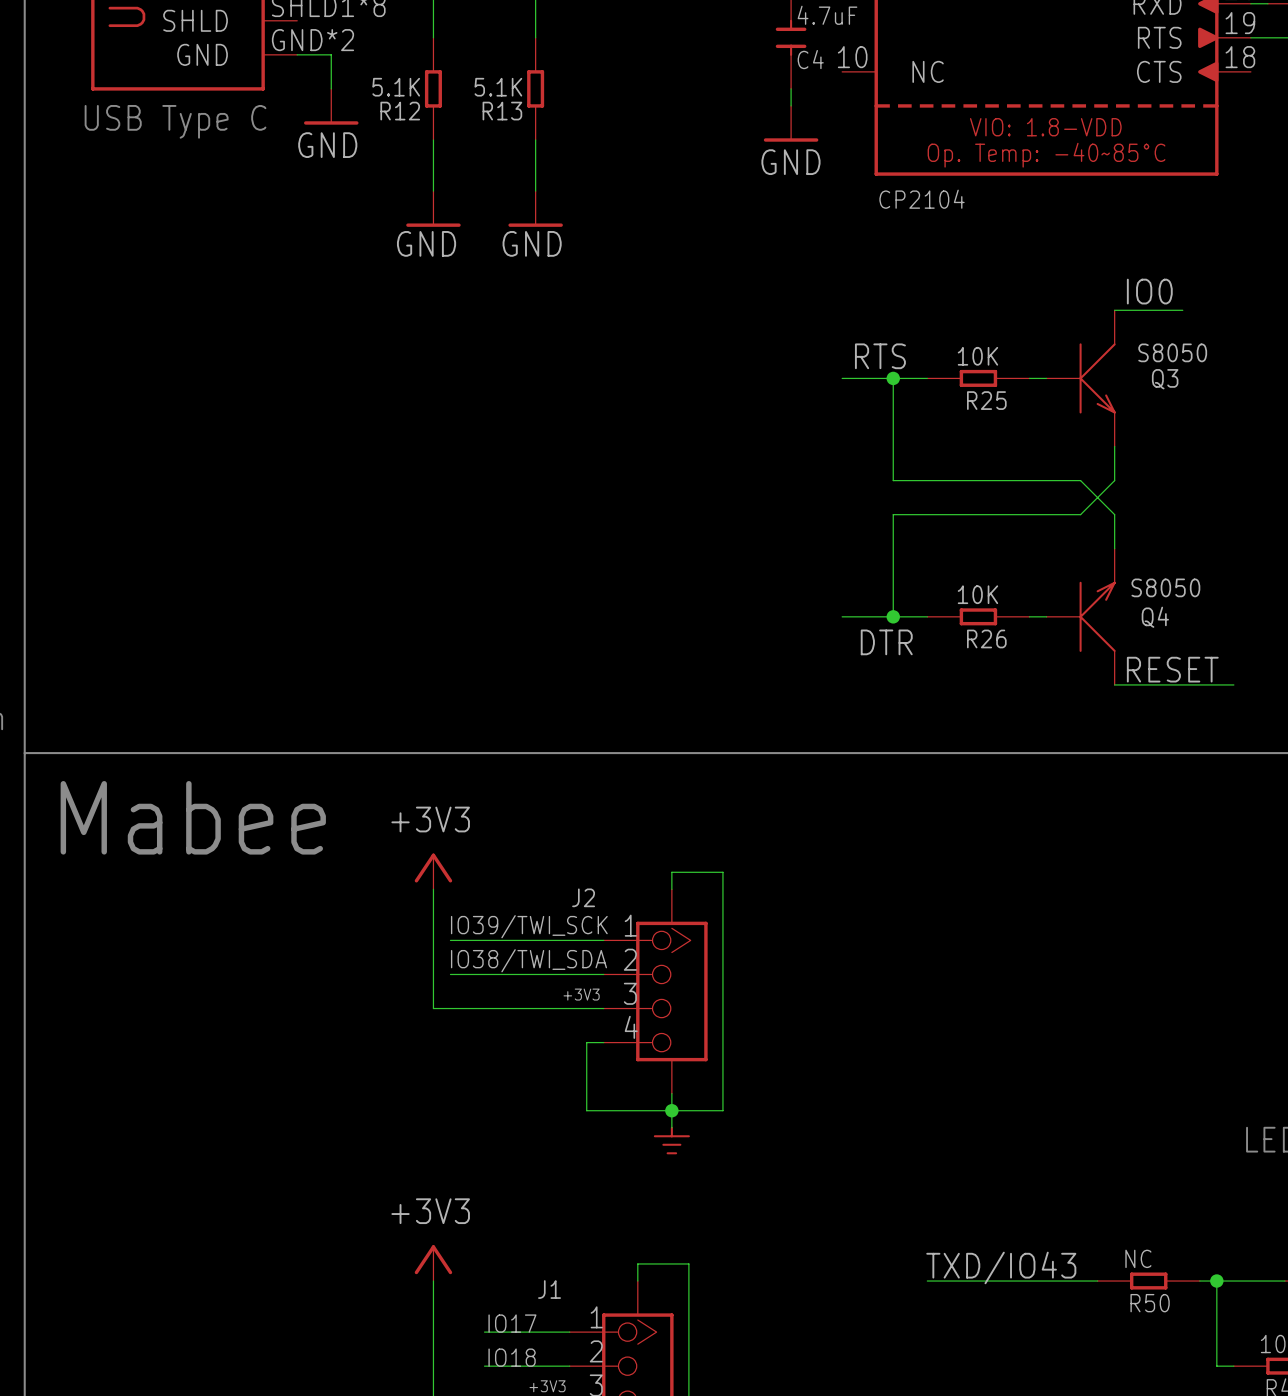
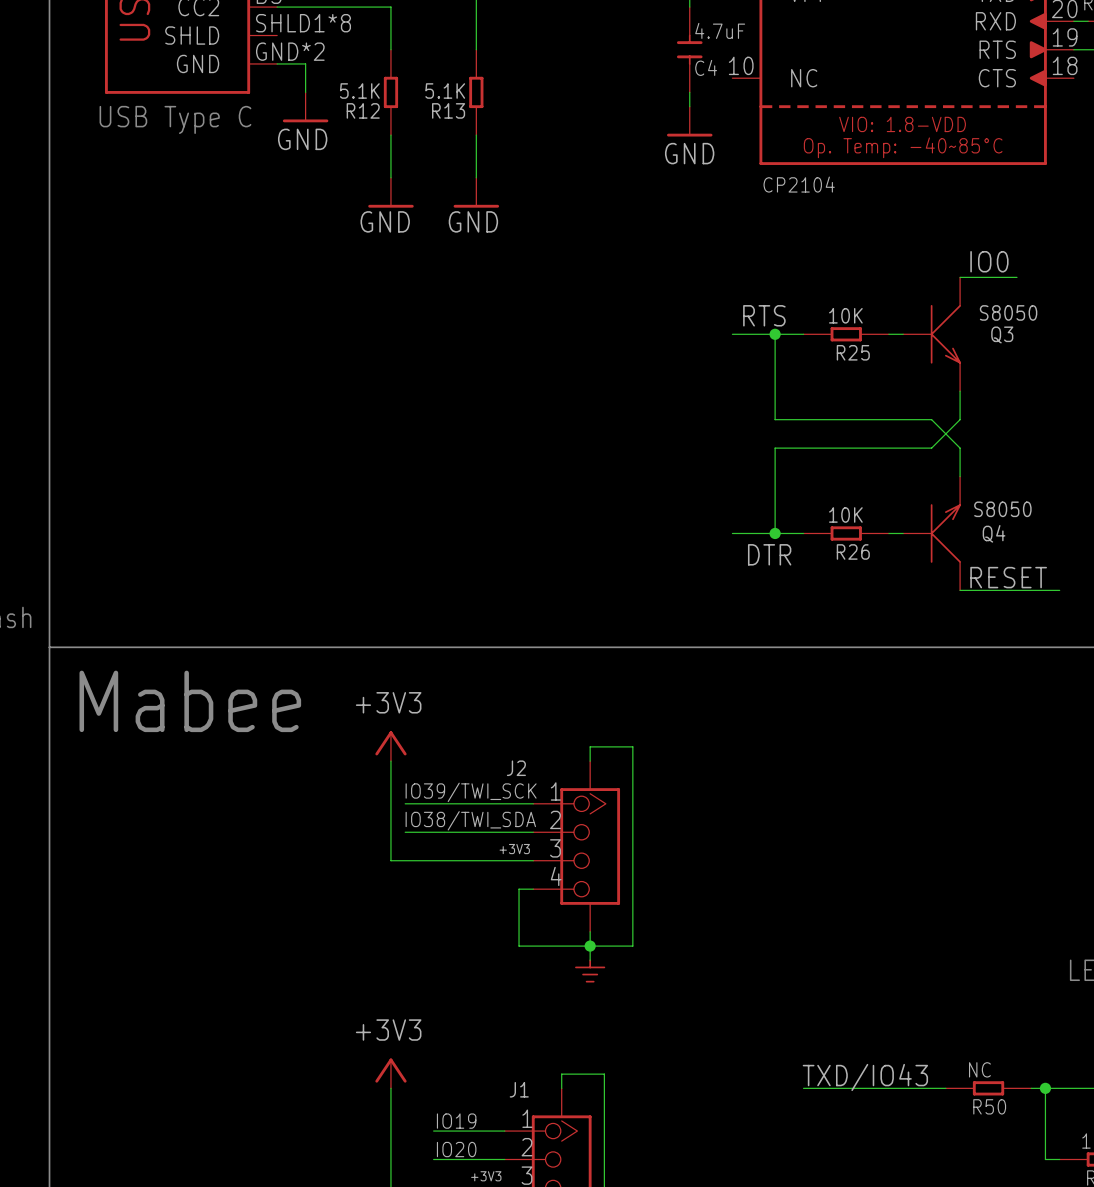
J1 name position: J1 (549, 1289) -> J1 (519, 1089)
label: IO17 (512, 1323) -> IO19 (456, 1121)
label: IO18 (512, 1357) -> IO20 (456, 1149)

